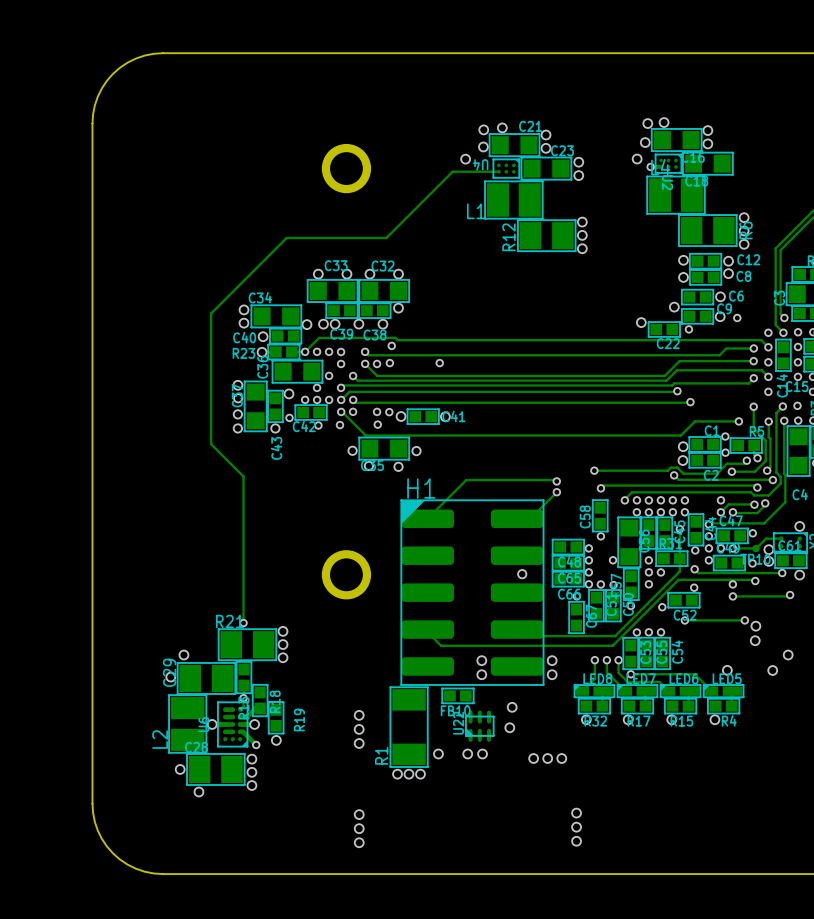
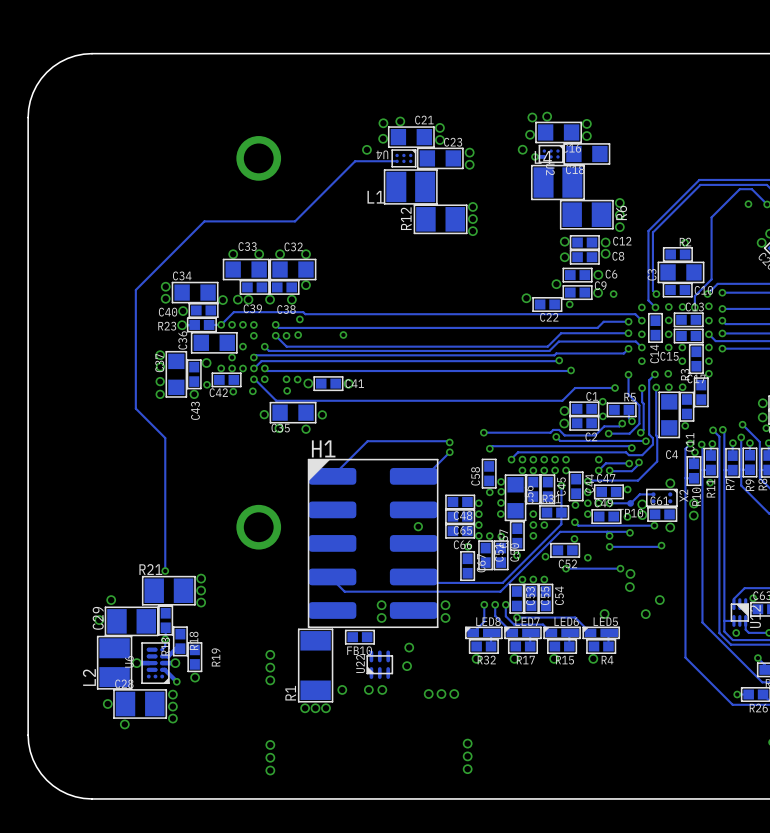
via: none -> (501, 481)
via: none -> (501, 491)
via: none -> (501, 502)
via: none -> (587, 557)

